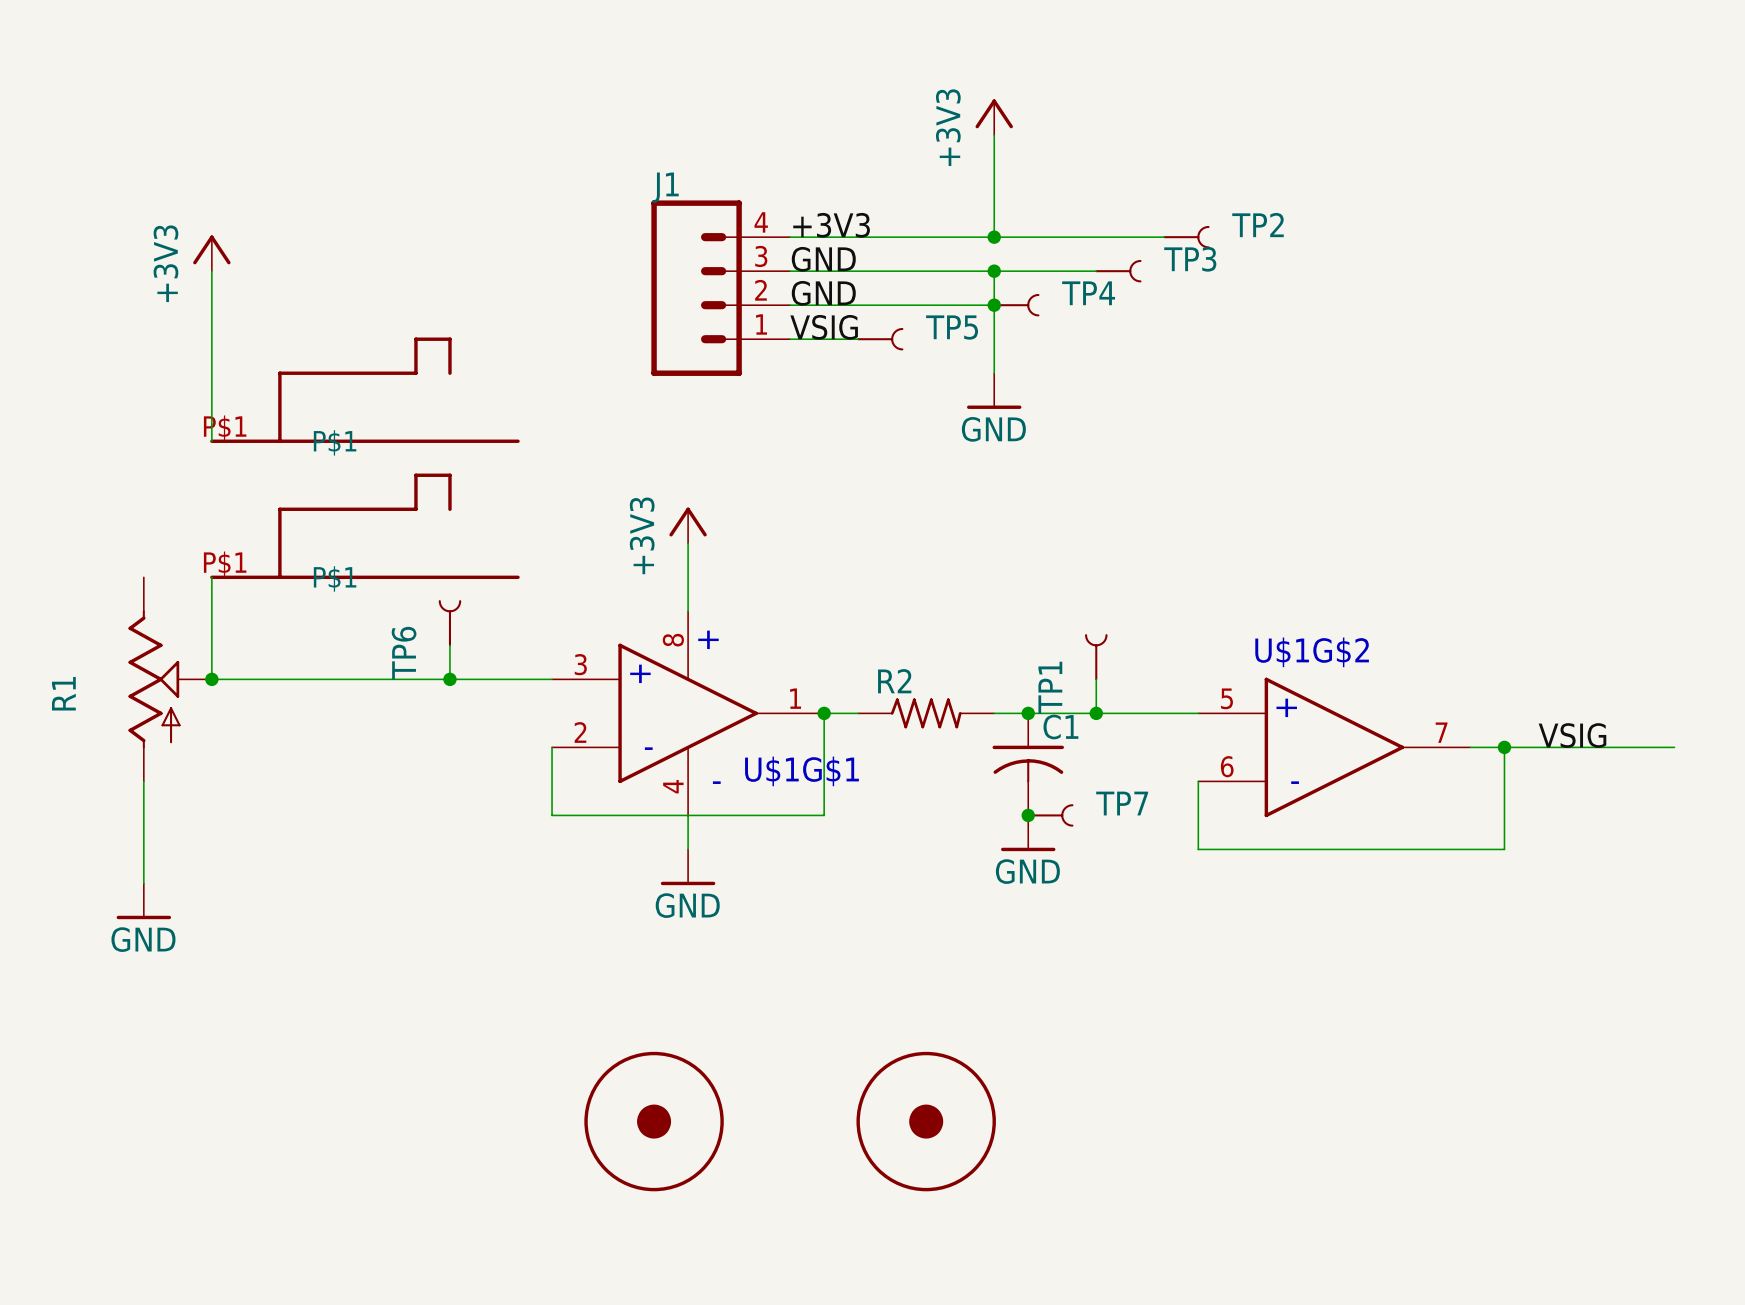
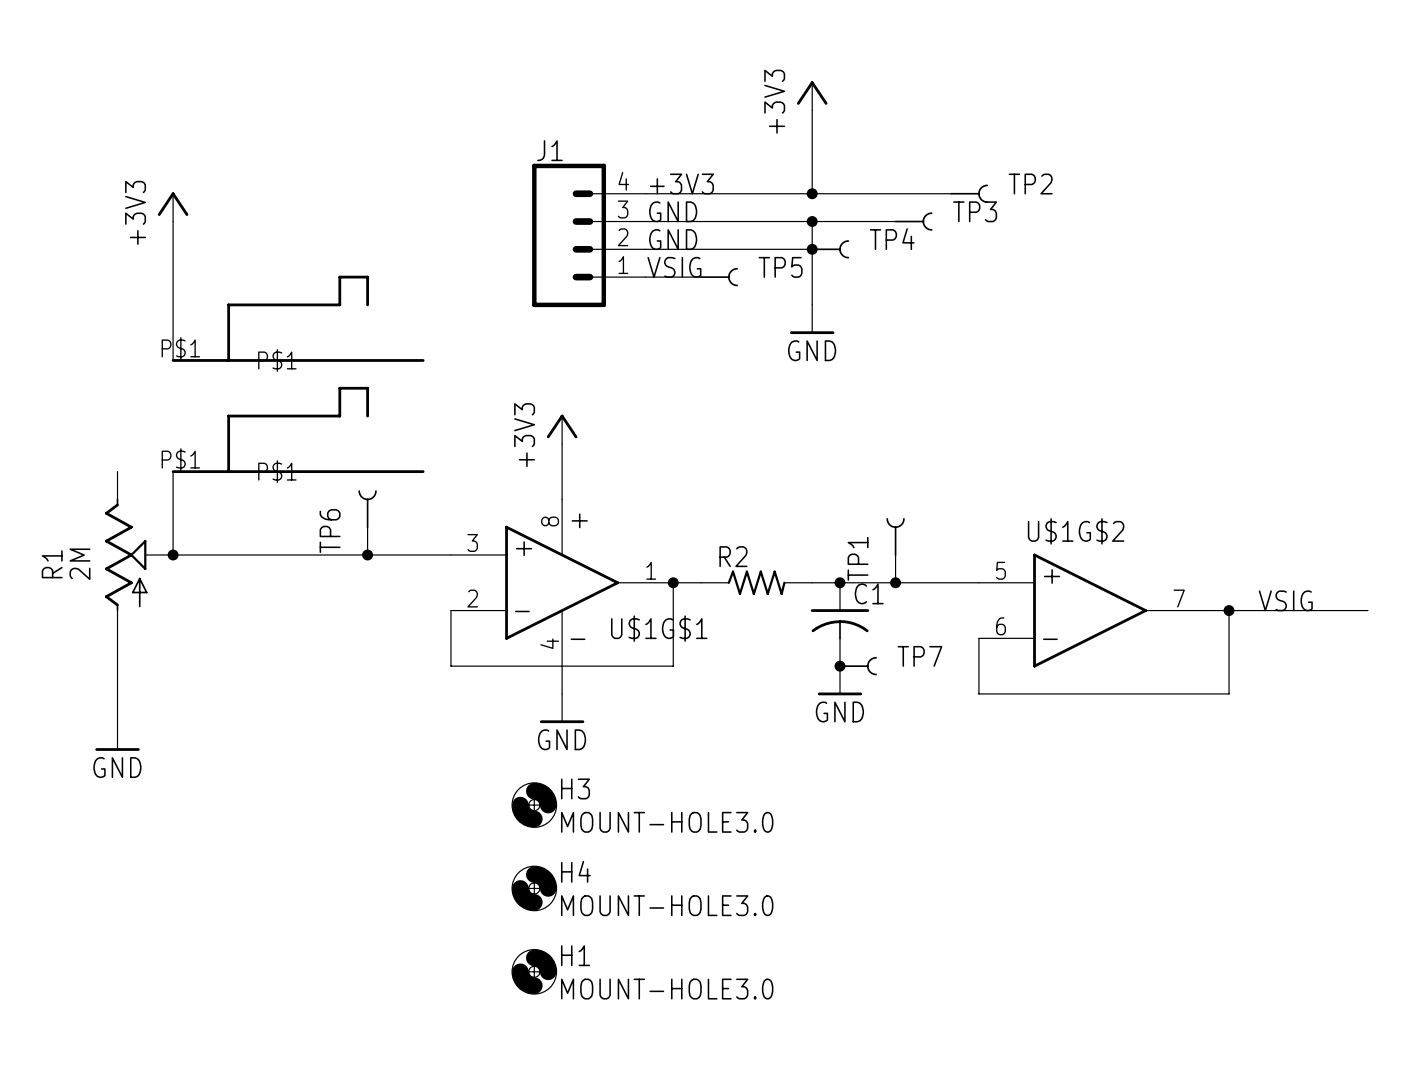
R1 value: none -> 2M (79, 564)
H3: none -> MOUNT-HOLE3.0 (534, 805)
H4: none -> MOUNT-HOLE3.0 (534, 888)
part: (654, 1121) -> none
part: (926, 1121) -> none
H1: none -> MOUNT-HOLE3.0 (534, 971)

